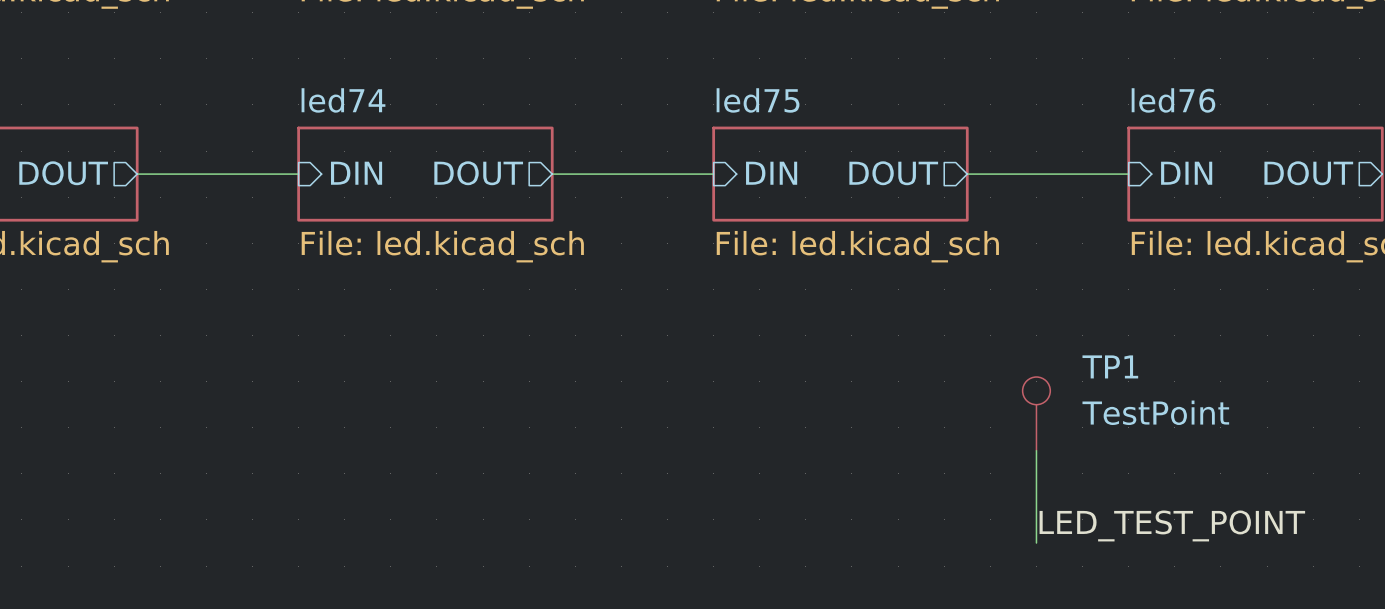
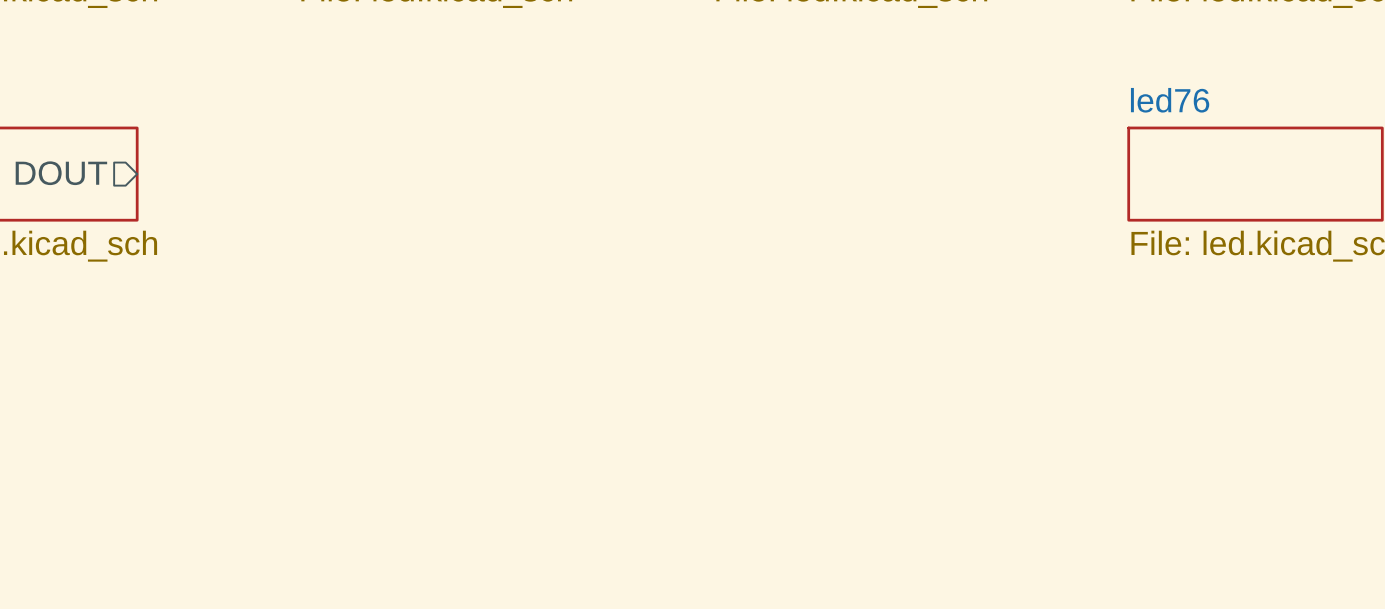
sheet pin: DIN (356, 173) -> none
sheet pin: DOUT (478, 173) -> none
sheet pin: DIN (771, 173) -> none
sheet pin: DOUT (893, 173) -> none
sheet pin: DIN (1186, 173) -> none
sheet pin: DOUT (1308, 173) -> none
wire: (137, 174) (298, 174) -> none
sheet led74: File: led.kicad_sch (425, 174) -> none
wire: (552, 174) (713, 174) -> none
sheet led75: File: led.kicad_sch (840, 174) -> none
wire: (967, 174) (1128, 174) -> none
TP1: TestPoint (1036, 413) -> none
wire: (1036, 450) (1036, 543) -> none
label: LED_TEST_POINT (1172, 525) -> none

